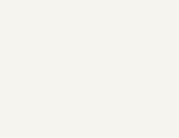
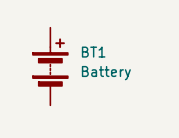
BT1: none -> Battery (50, 66)

